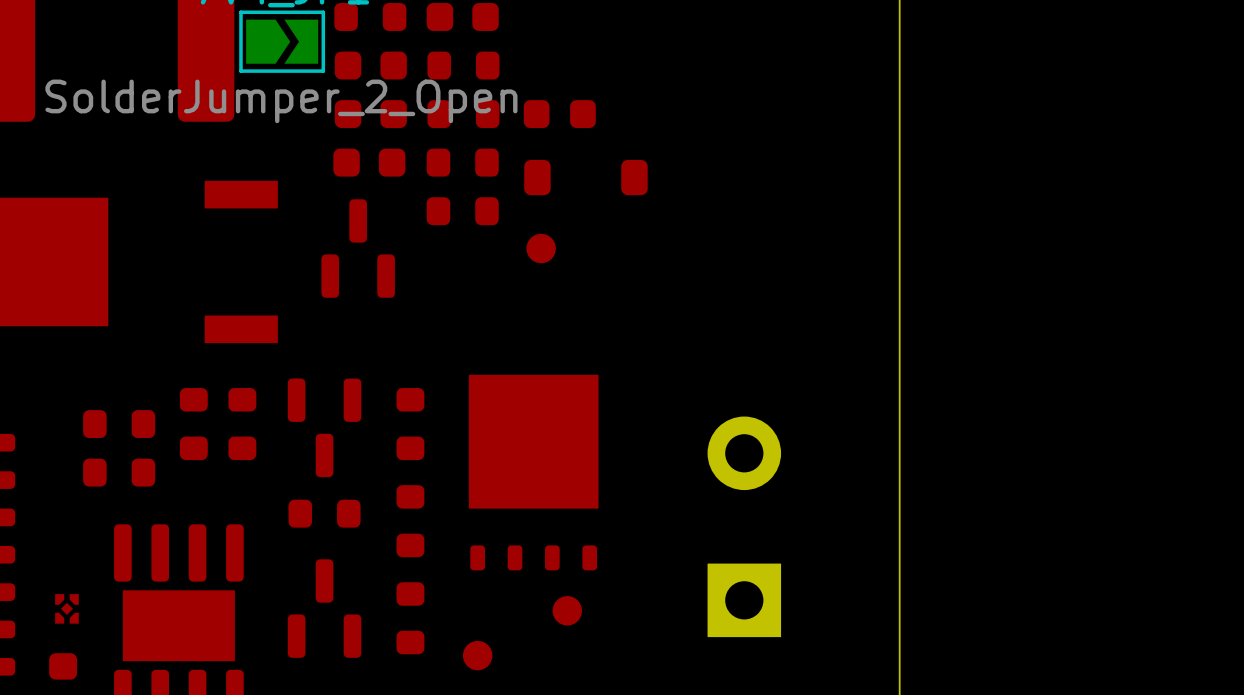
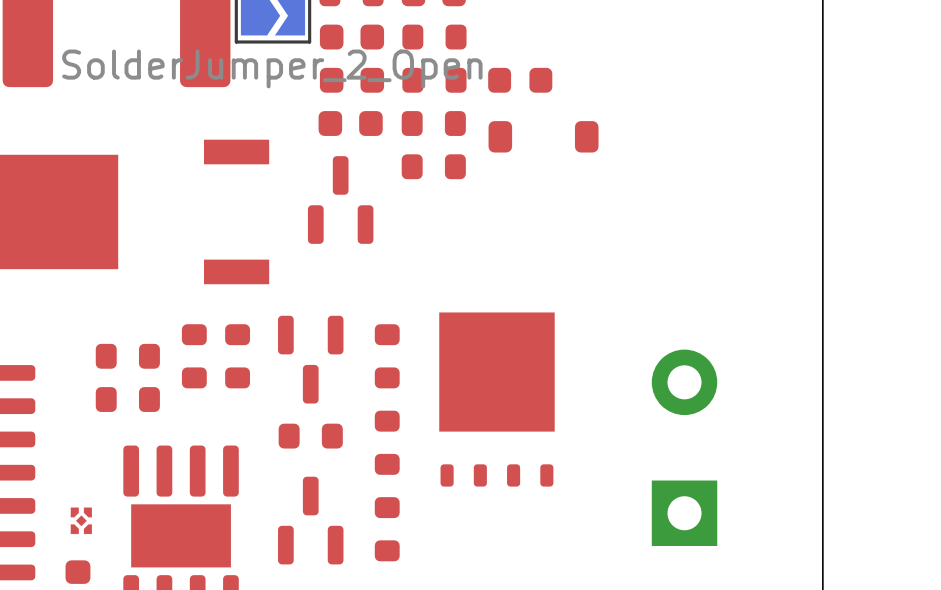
part: (541, 248) -> none
part: (567, 610) -> none
part: (477, 655) -> none

